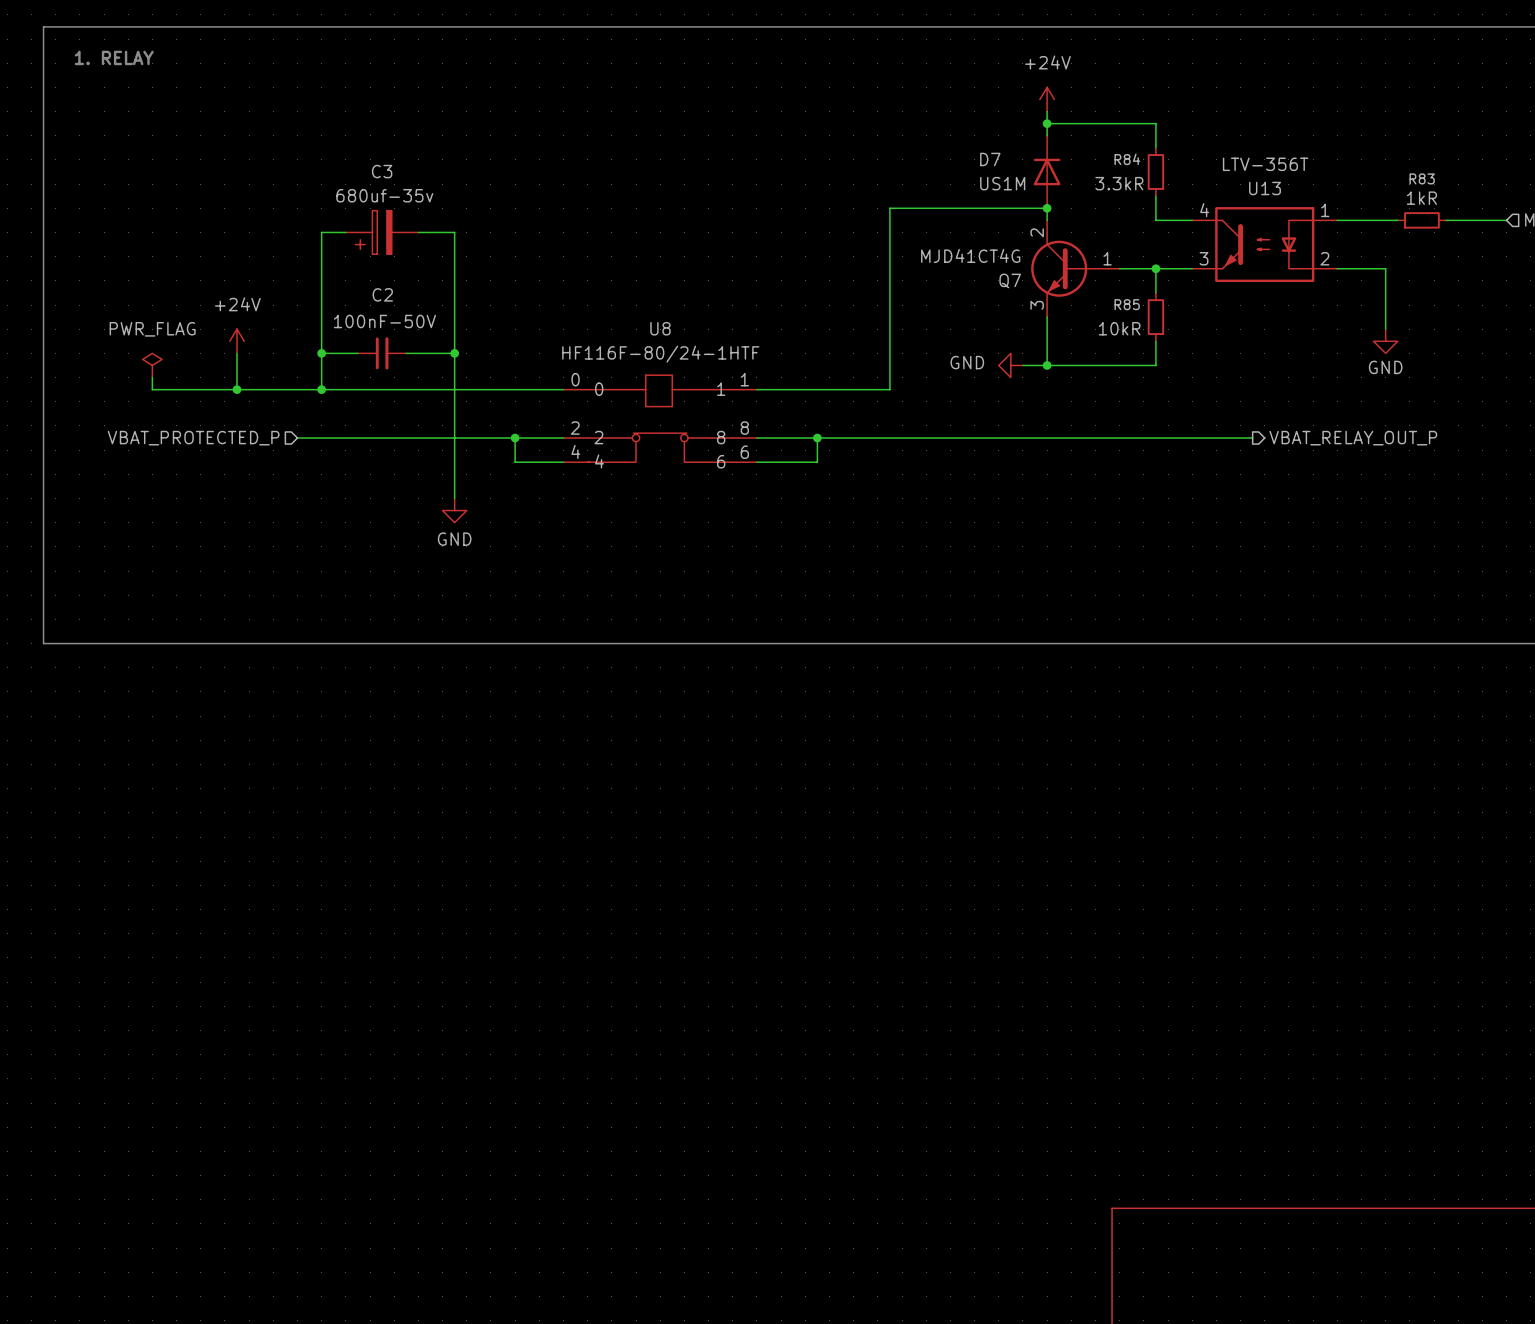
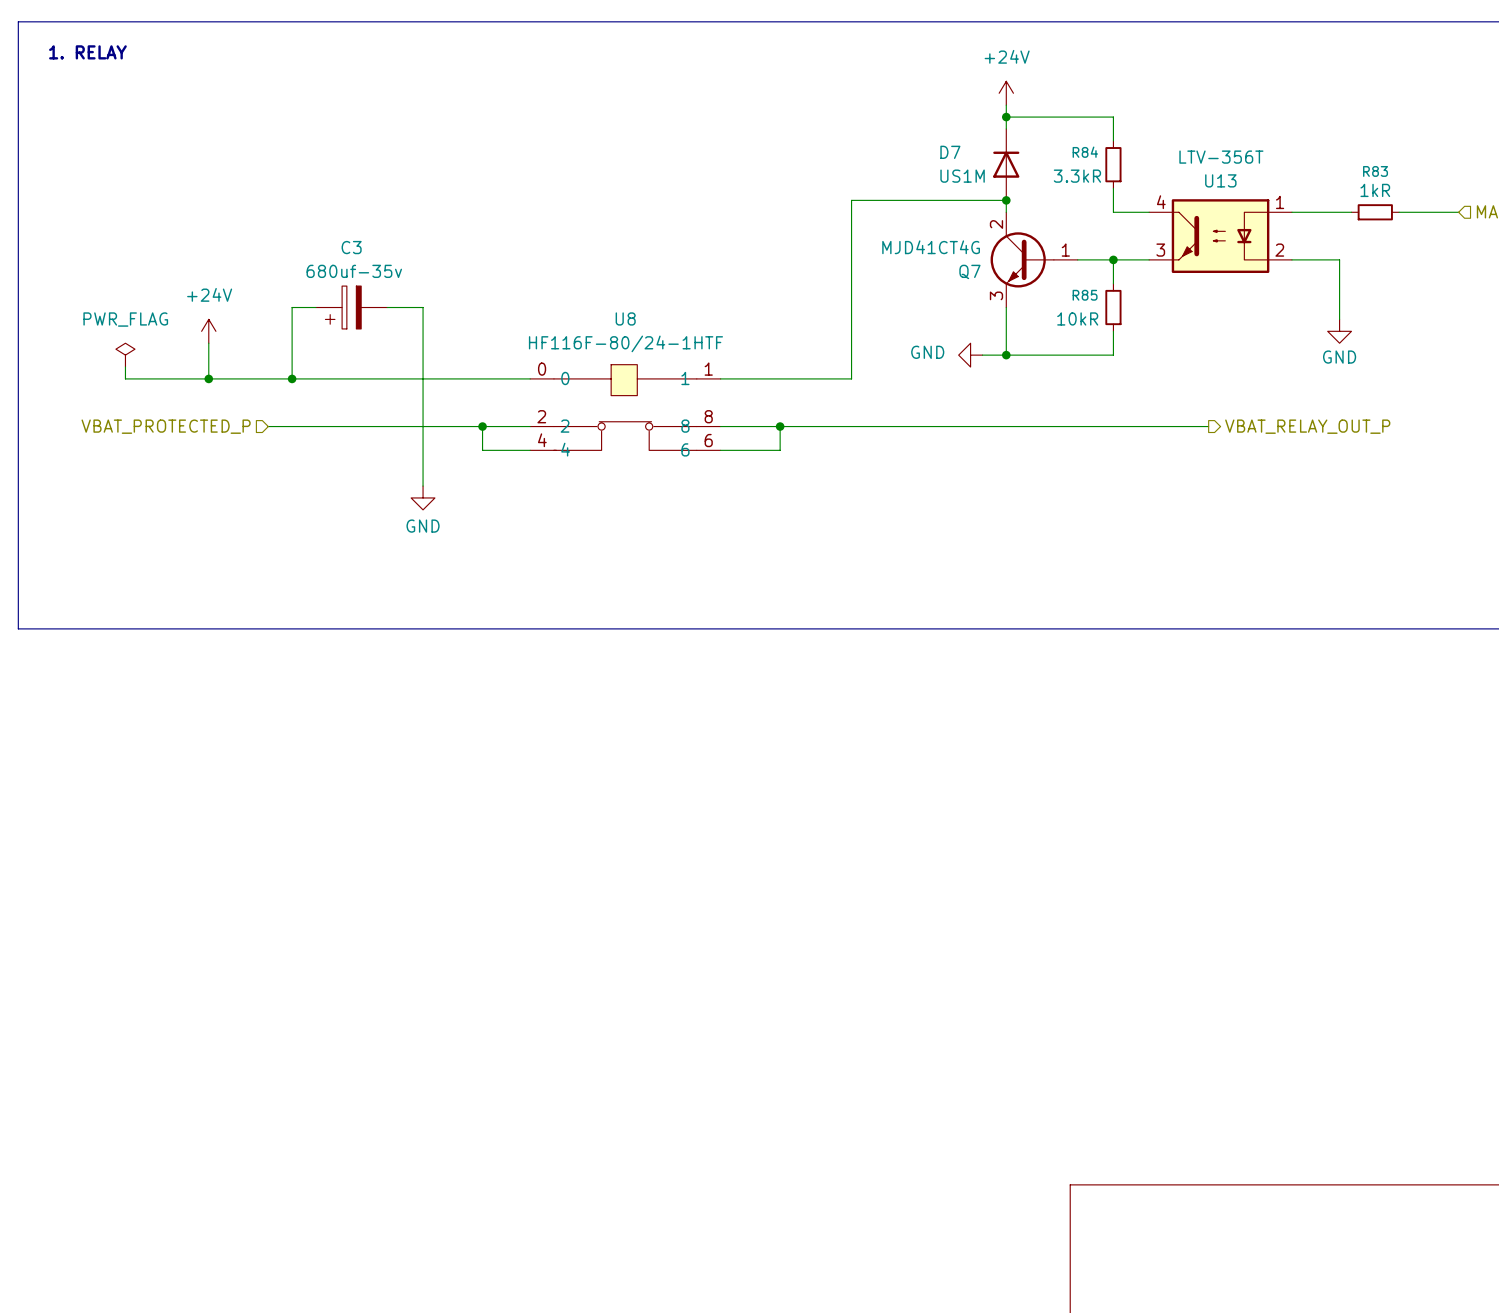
wire: (345, 232) (321, 232) (321, 317) -> (315, 307) (292, 307)
C3 position: (382, 232) -> (351, 307)
wire: (418, 232) (454, 232) (454, 317) -> (387, 307) (423, 307)
wire: (321, 353) (357, 353) -> none
junction: (321, 353) -> none
C2: 100nF-50V (382, 353) -> none
wire: (406, 353) (454, 353) -> none
junction: (454, 353) -> none

